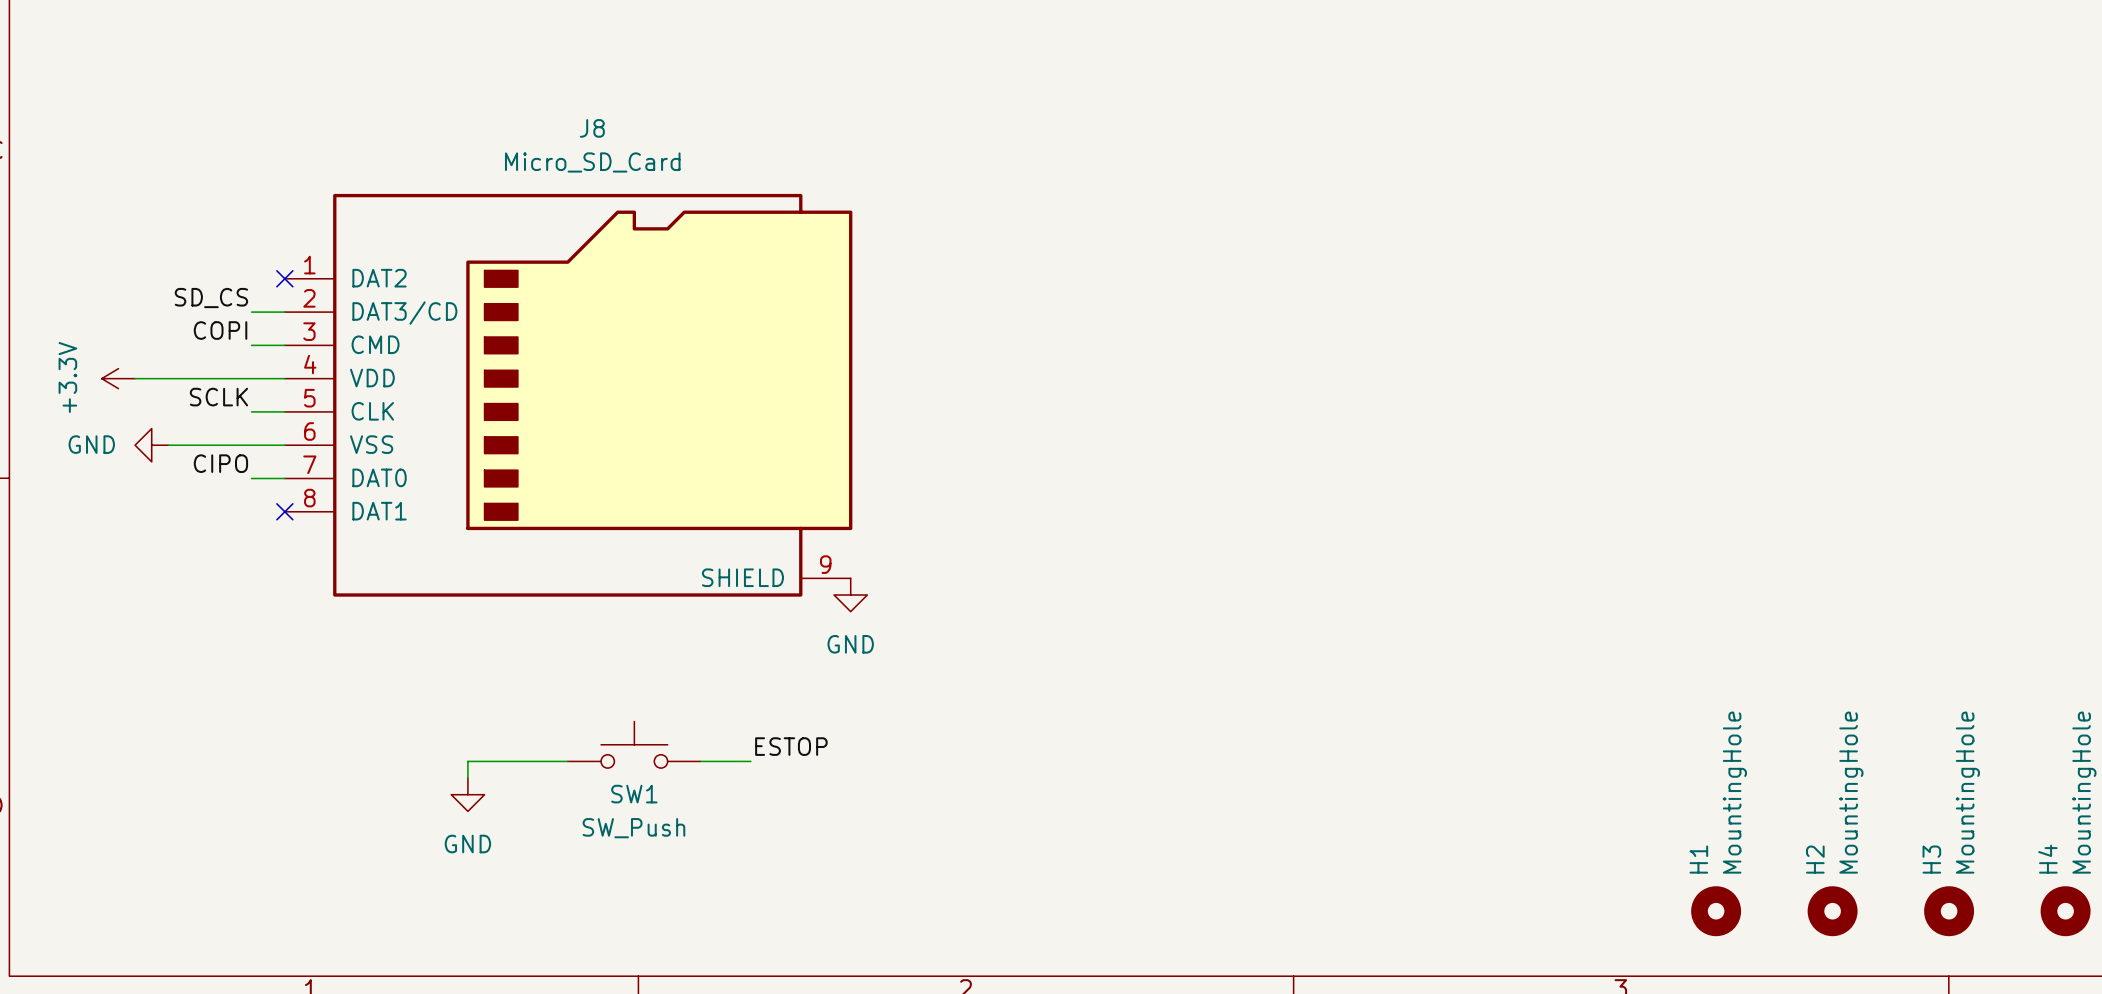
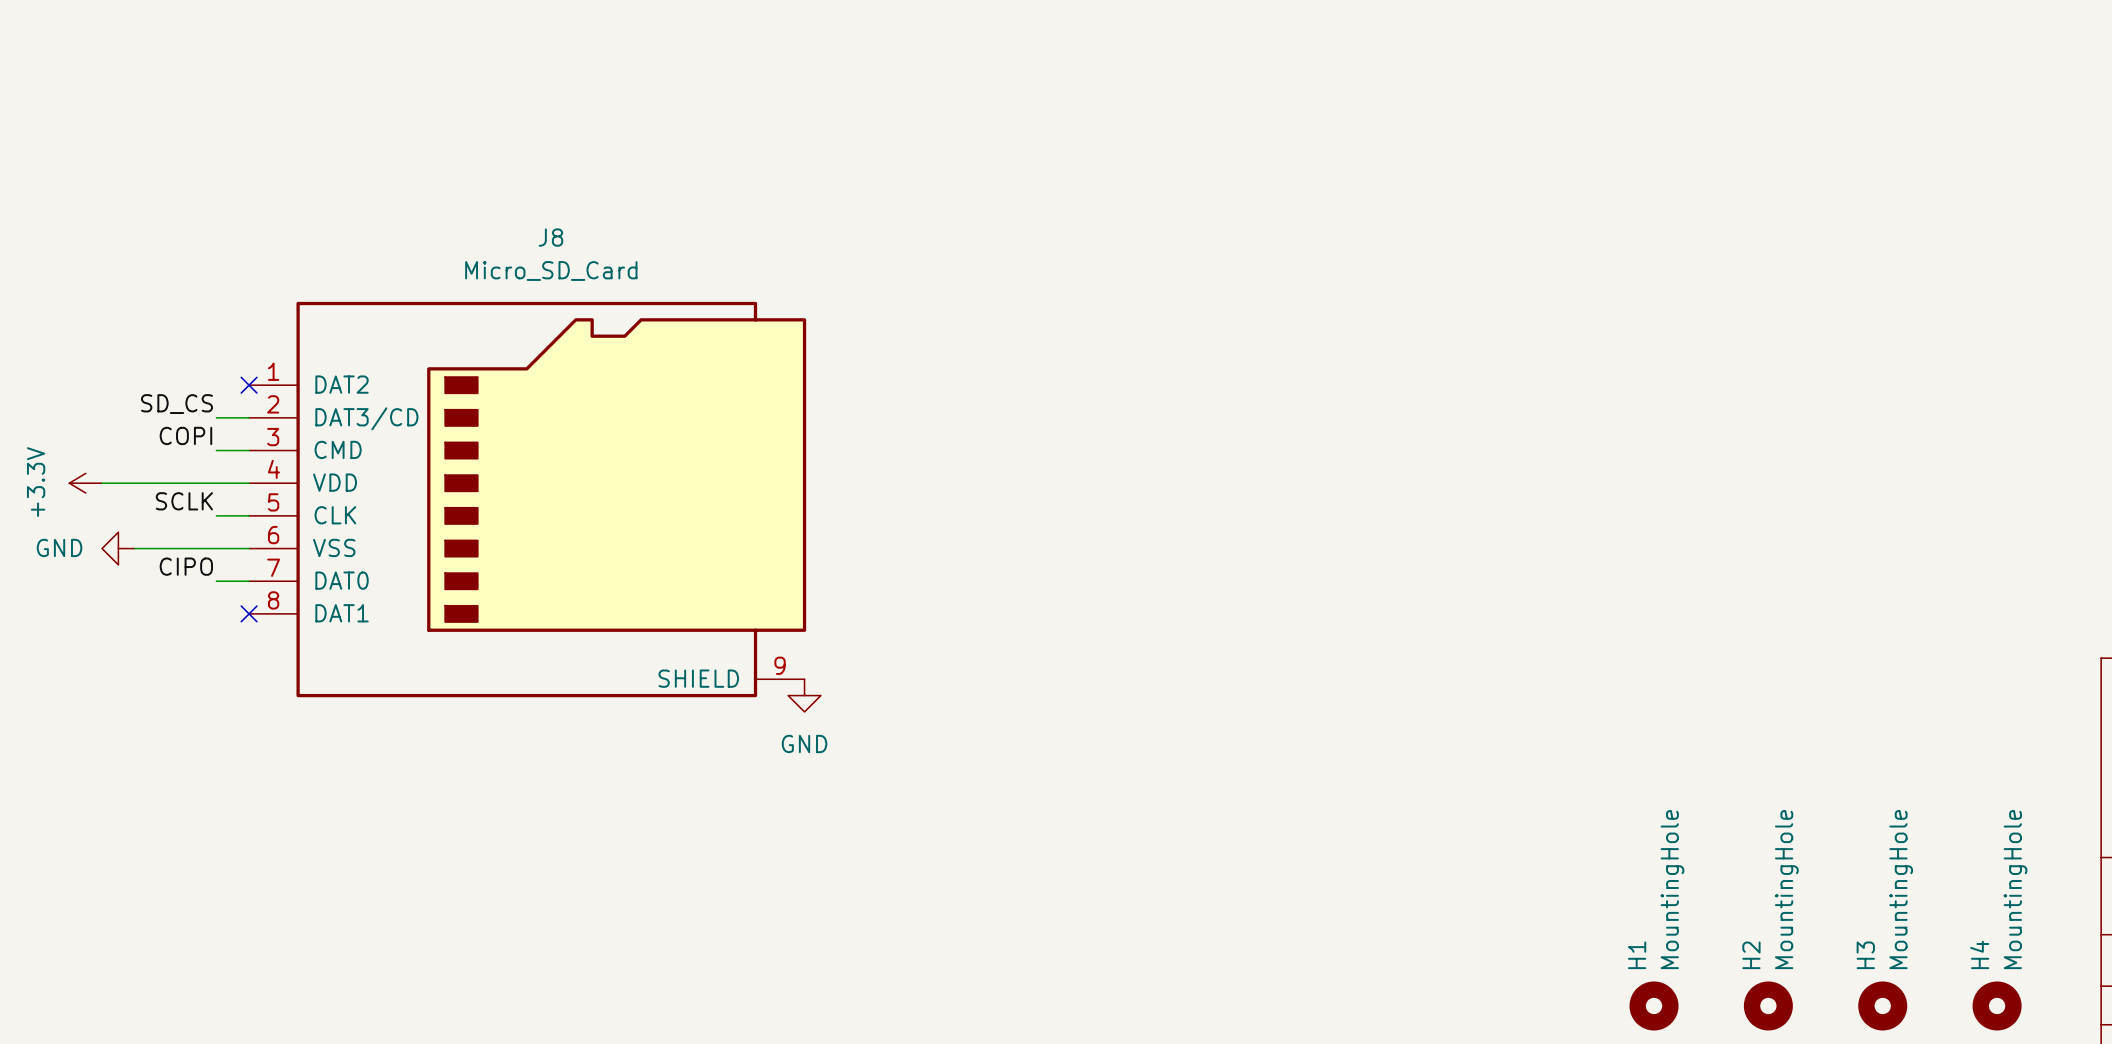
SW1: SW_Push (634, 744) -> none
label: ESTOP (791, 746) -> none
wire: (567, 761) (467, 761) (467, 778) -> none
wire: (700, 761) (750, 761) -> none
power symbol: GND (467, 794) -> none

